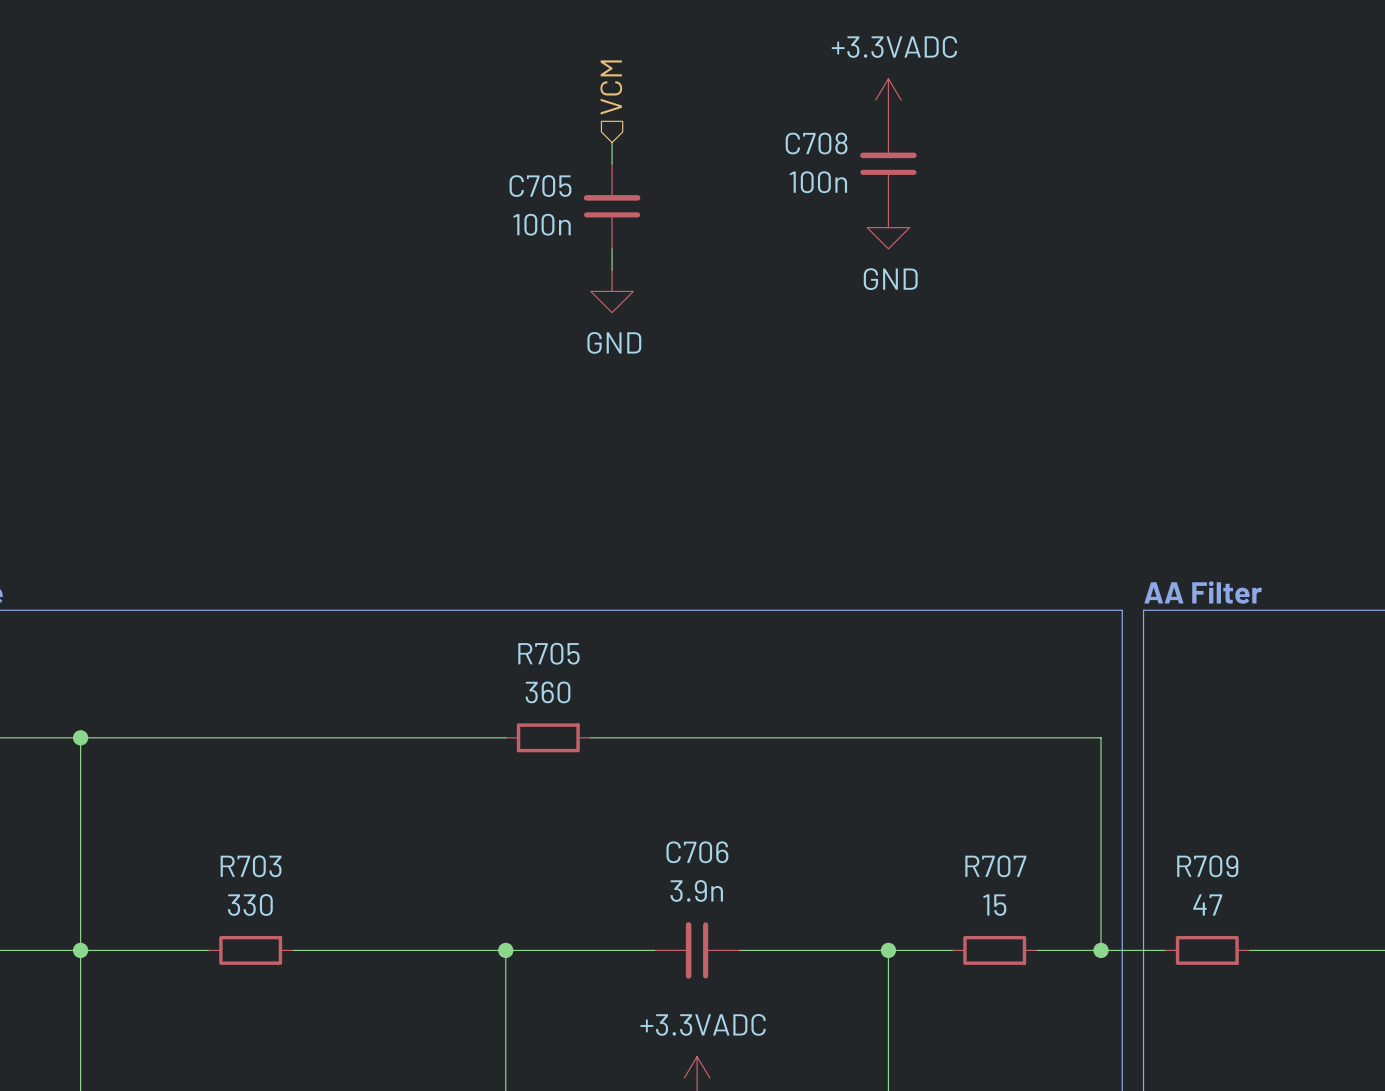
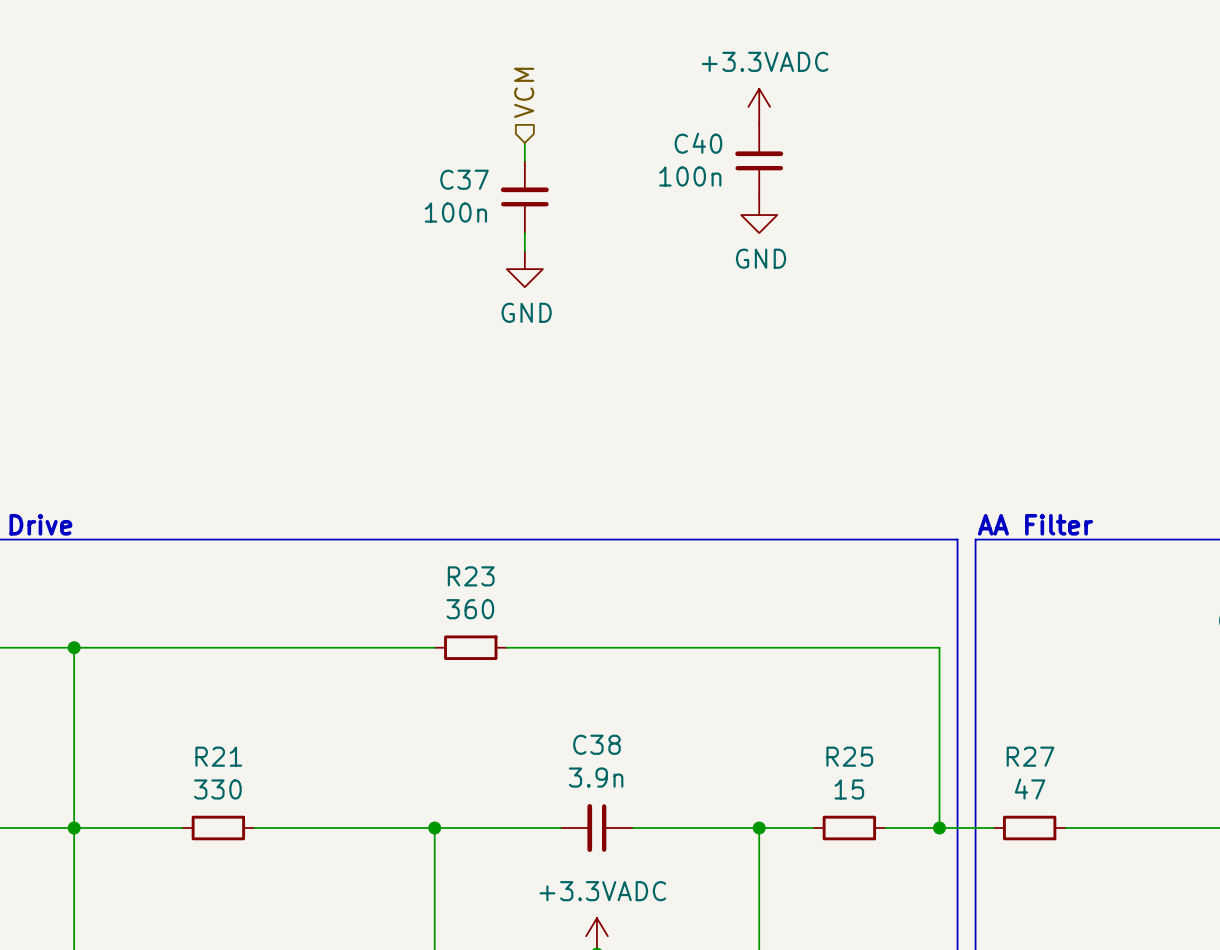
C708 name: C708 (816, 143) -> C40 (698, 143)
C705 name: C705 (540, 186) -> C37 (464, 179)
R705 name: R705 (548, 653) -> R23 (471, 576)
C706 name: C706 (697, 852) -> C38 (596, 744)
R703 name: R703 (251, 866) -> R21 (218, 756)
R707 name: R707 (995, 866) -> R25 (849, 756)
R709 name: R709 (1207, 866) -> R27 (1030, 756)

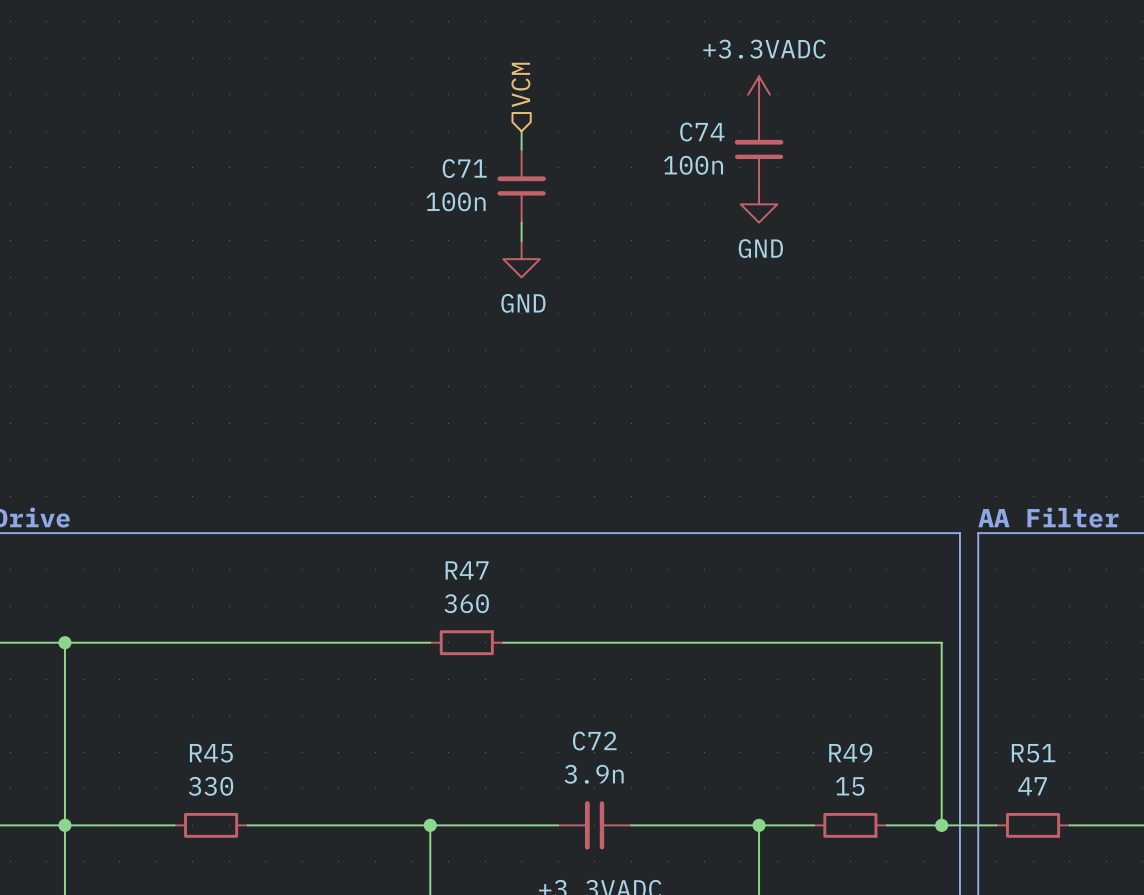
C40 name: C40 (698, 143) -> C74 (702, 132)
C37 name: C37 (464, 179) -> C71 (464, 168)
R23 name: R23 (471, 576) -> R47 (467, 570)
C38 name: C38 (596, 744) -> C72 (594, 741)
R21 name: R21 (218, 756) -> R45 (211, 753)
R25 name: R25 (849, 756) -> R49 (850, 752)
R27 name: R27 (1030, 756) -> R51 (1033, 753)

